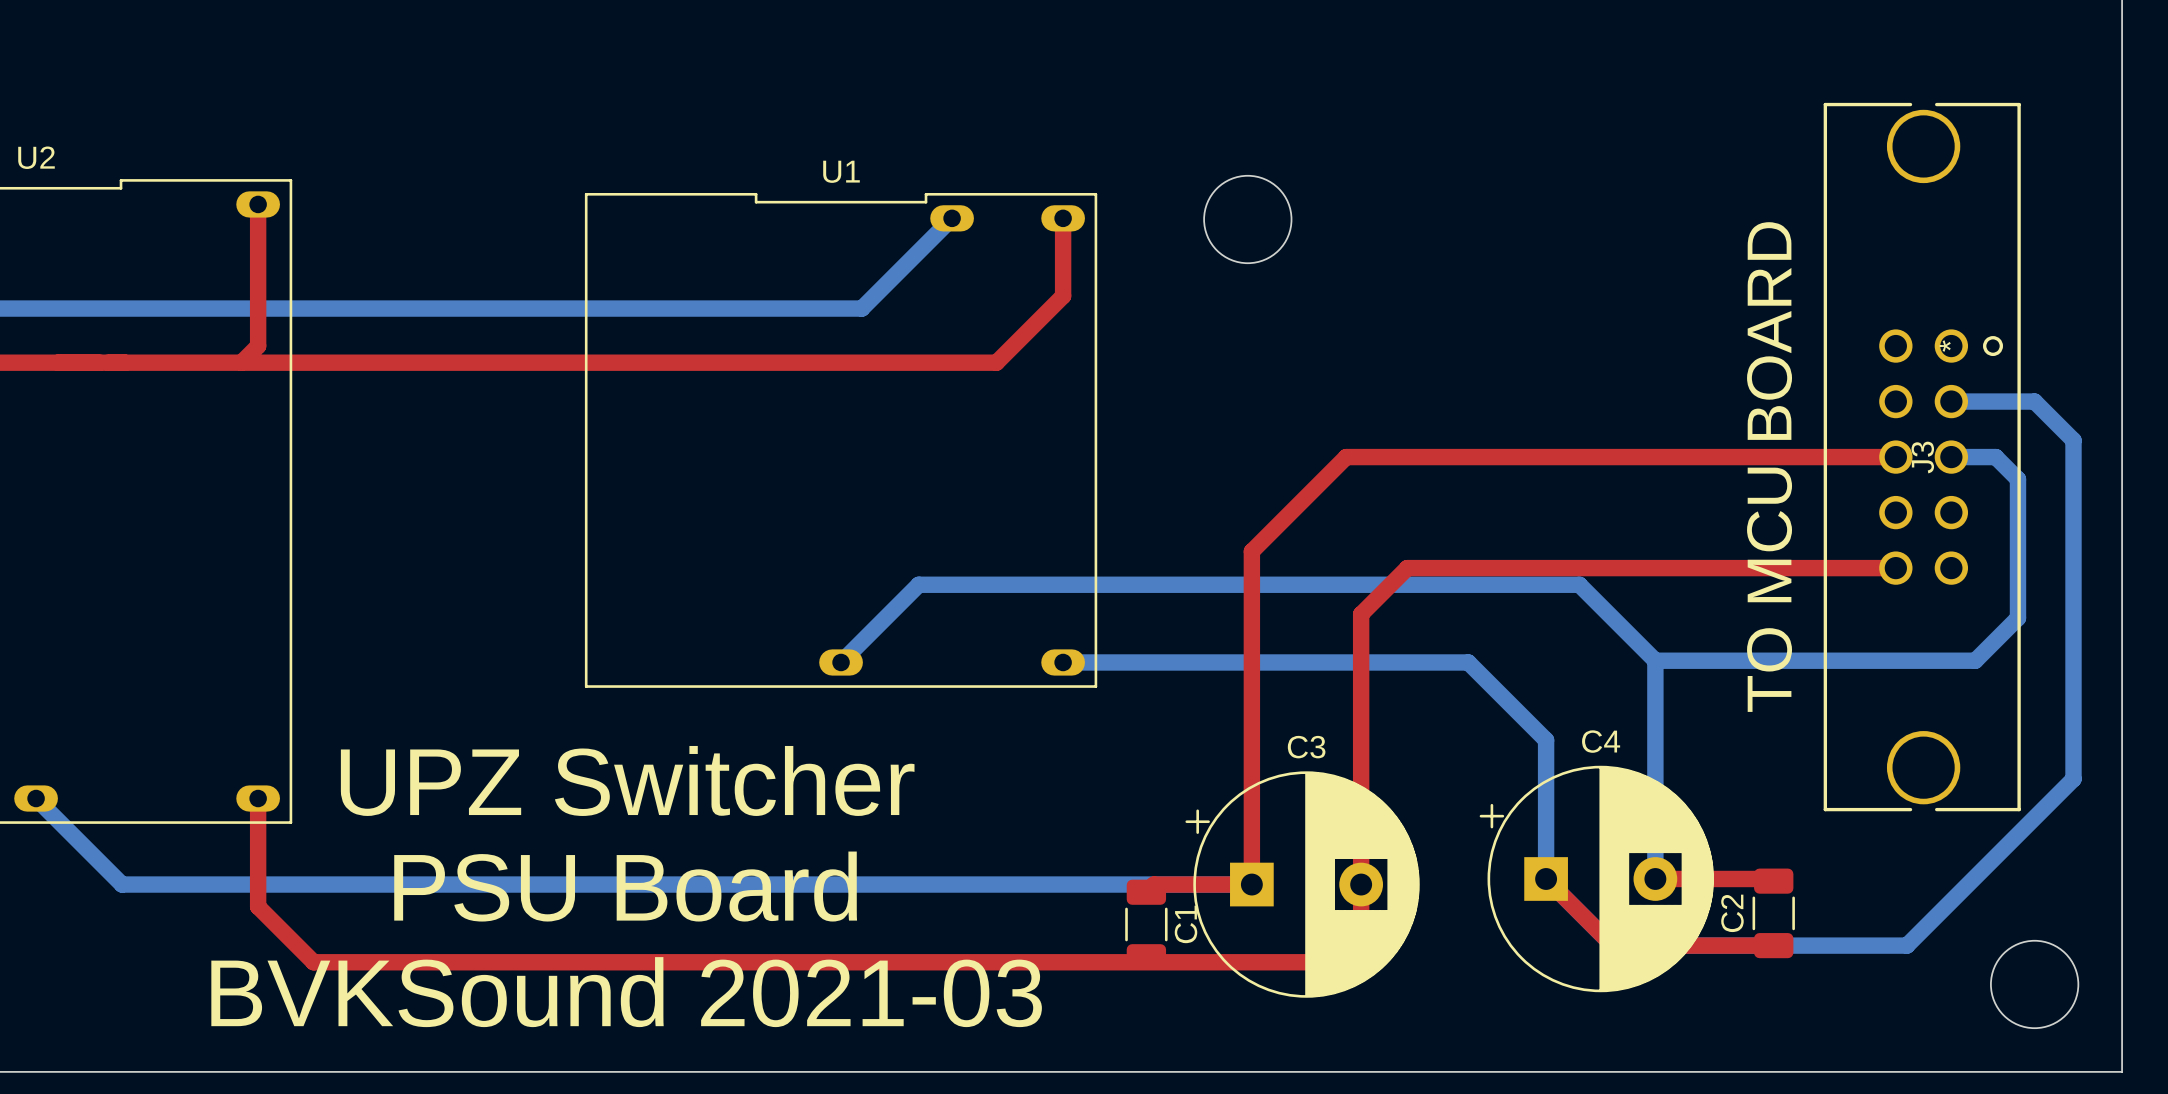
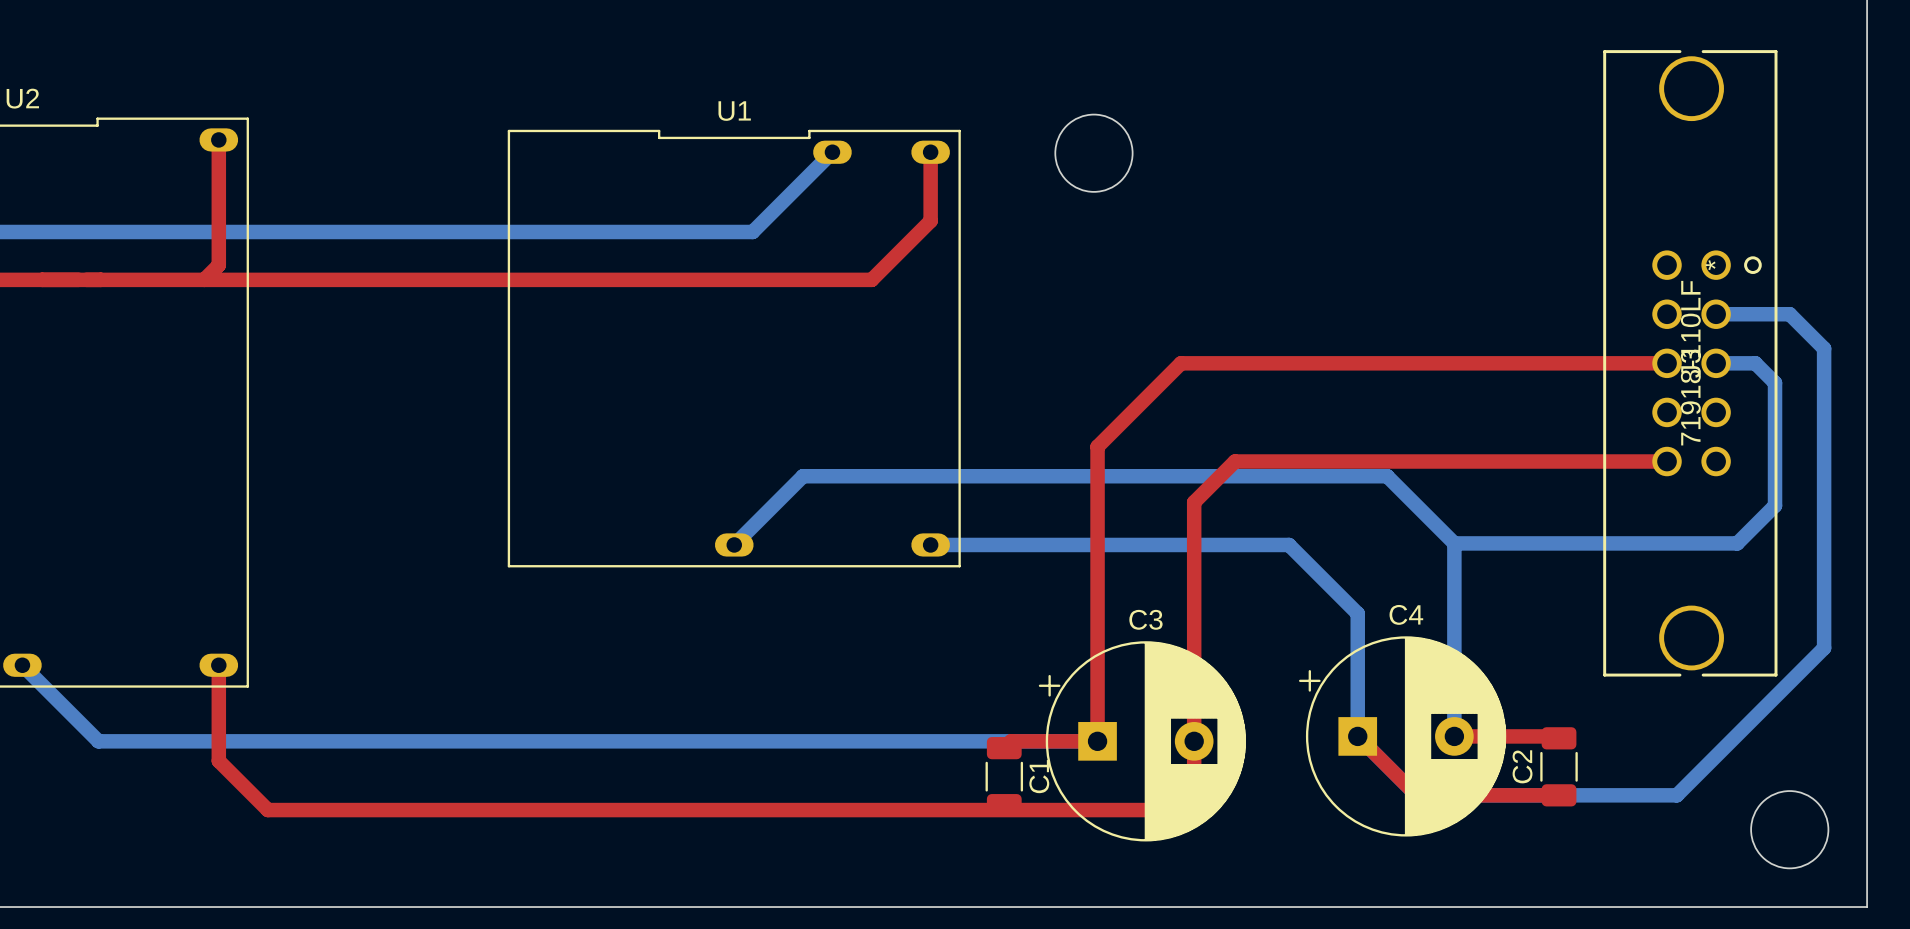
J3 value: TO MCU BOARD (1769, 467) -> 71918-110LF (1690, 363)
text: UPZ Switcher (627, 780) -> none
text: PSU Board (625, 886) -> none
text: BVKSound 2021-03 (626, 992) -> none

